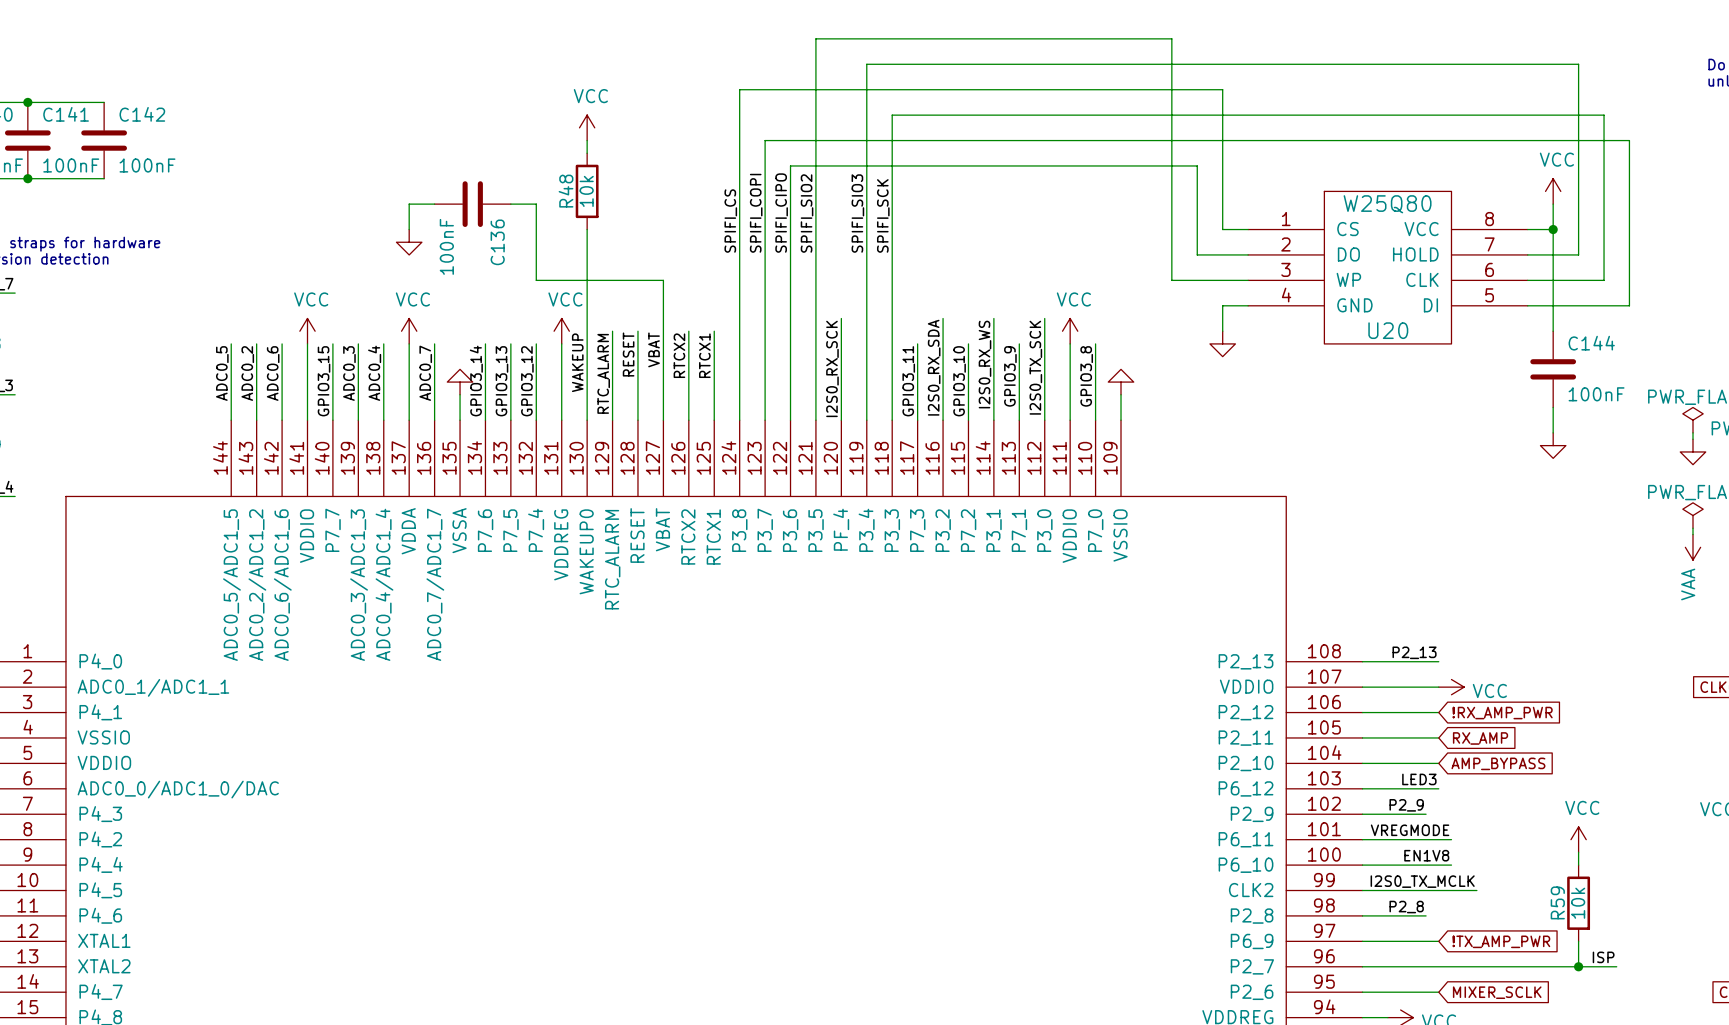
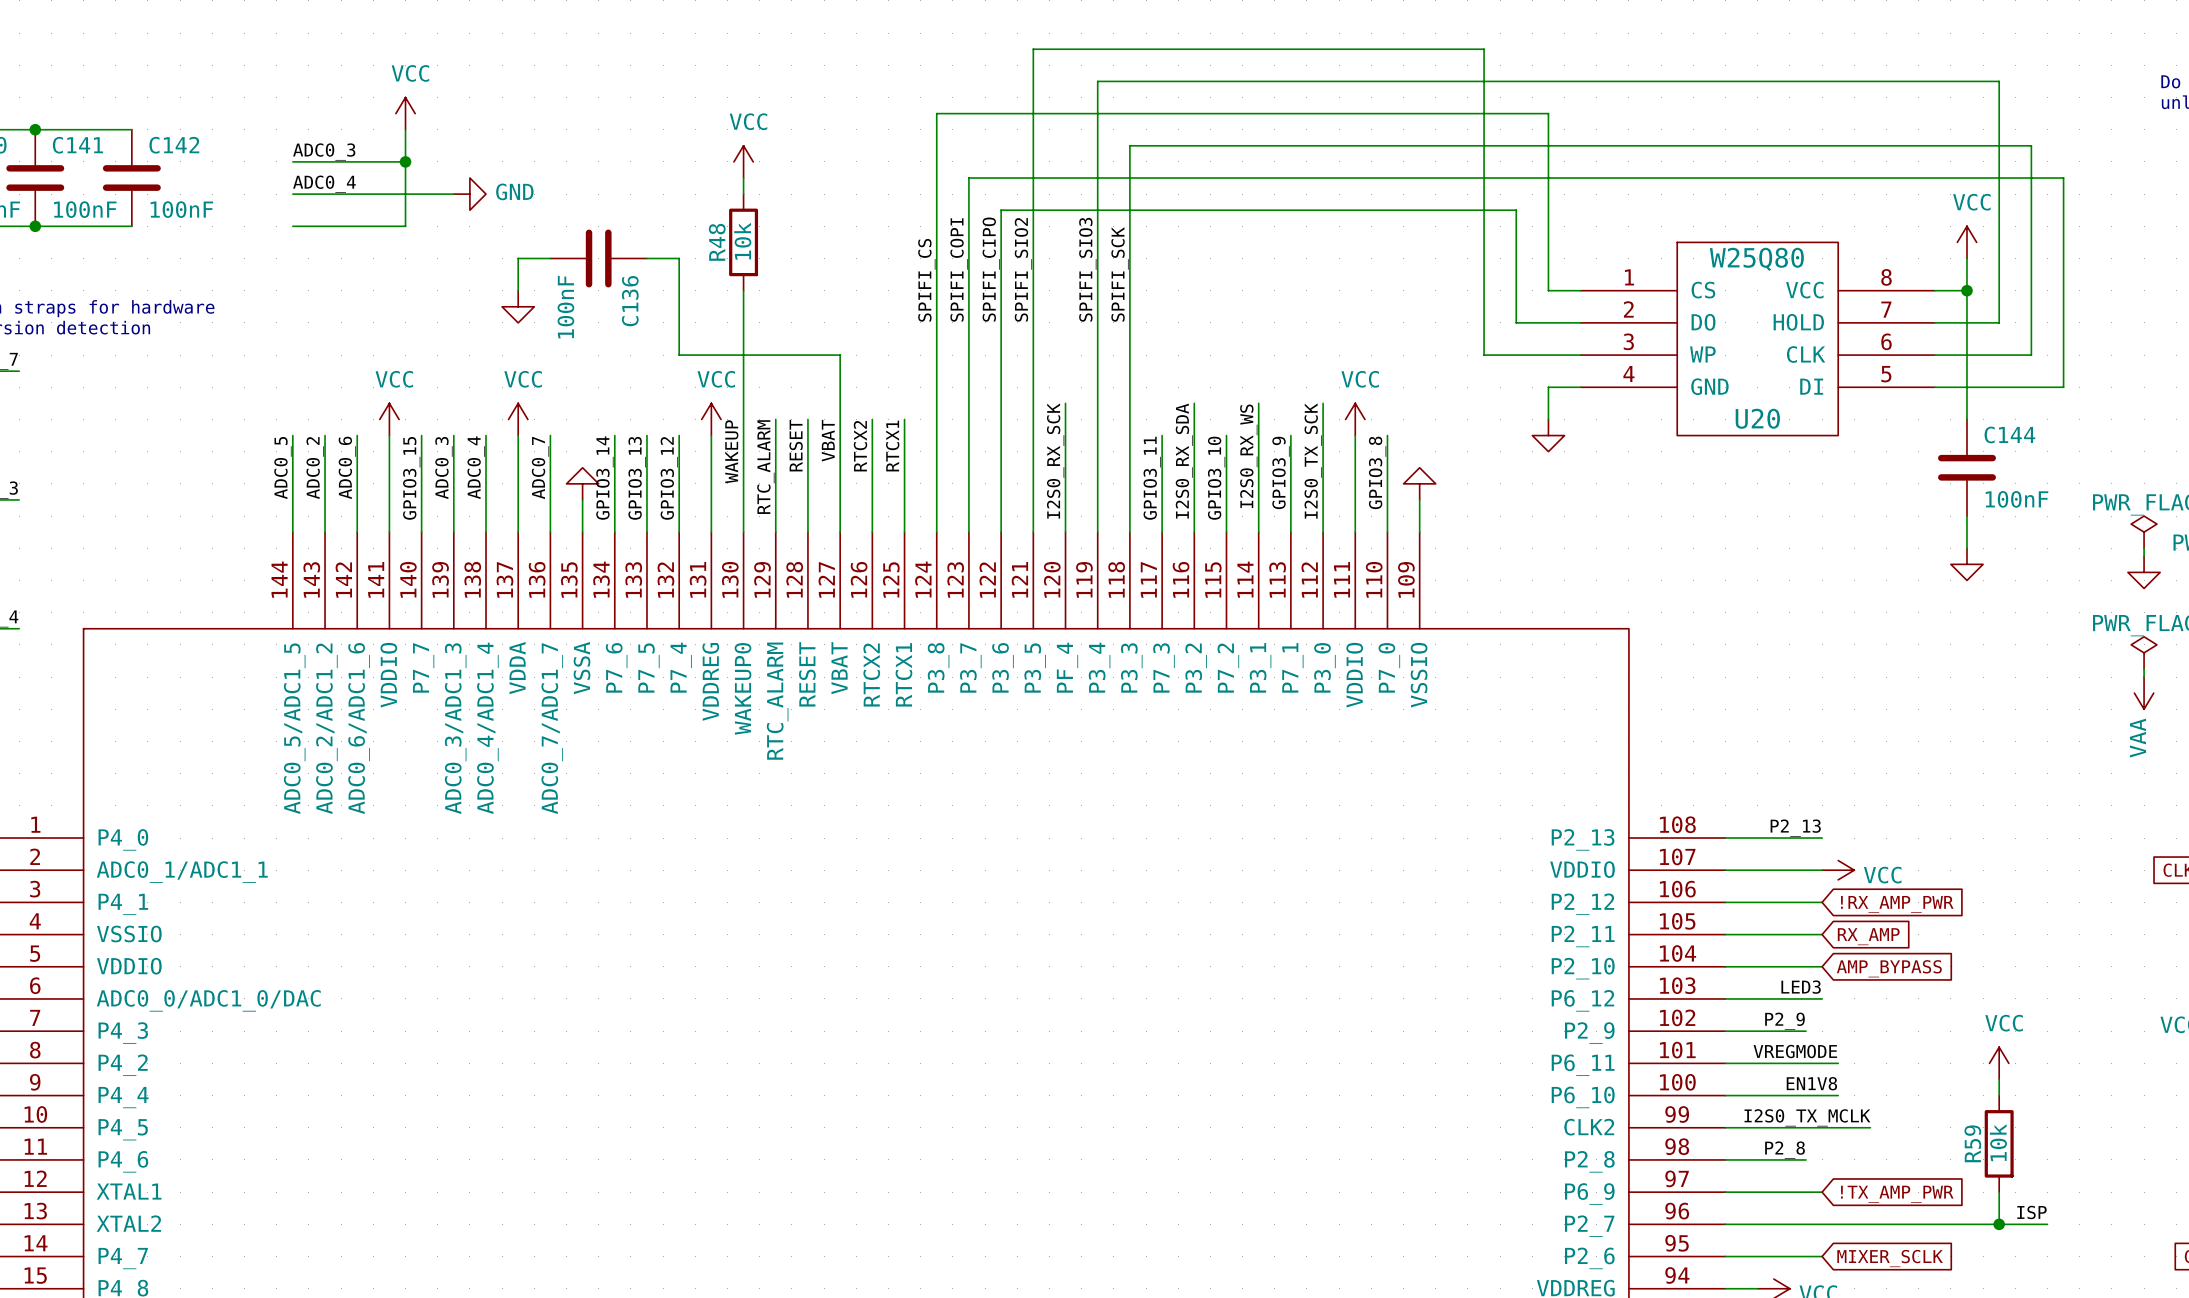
power symbol: none -> VCC (405, 113)
wire: none -> (405, 129) (405, 226) (292, 226)
label: none -> ADC0_3 (324, 152)
wire: none -> (292, 161) (405, 161)
junction: none -> (405, 161)
label: none -> ADC0_4 (324, 184)
wire: none -> (292, 194) (453, 194)
power symbol: none -> GND (469, 194)

